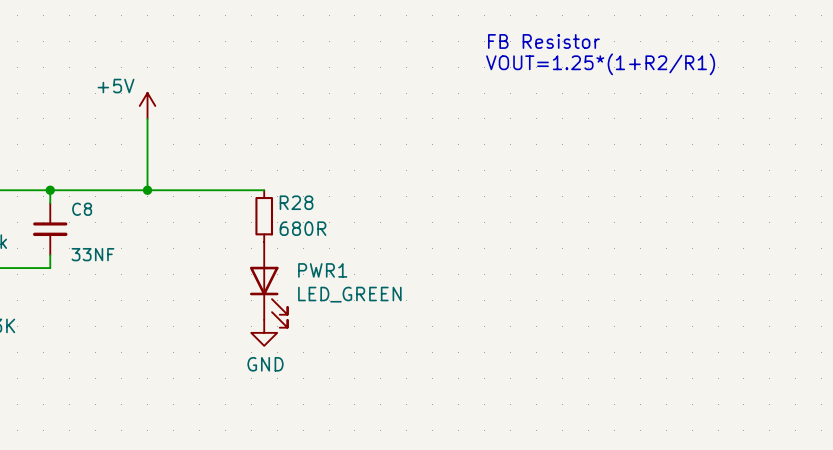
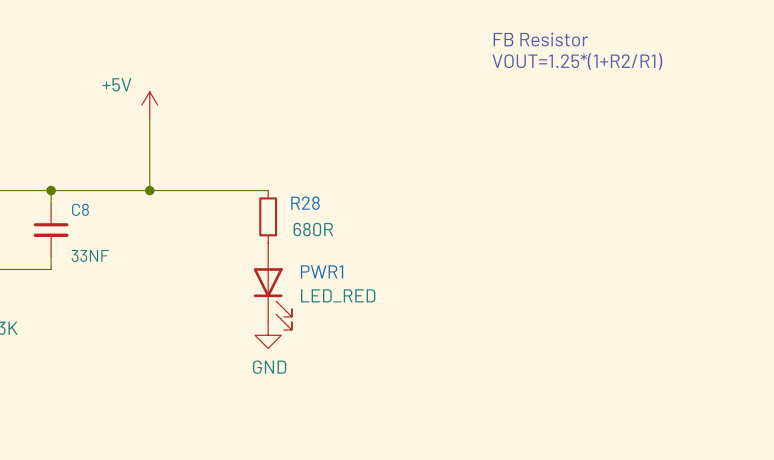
PWR1 value: LED_GREEN (349, 294) -> LED_RED (338, 295)

